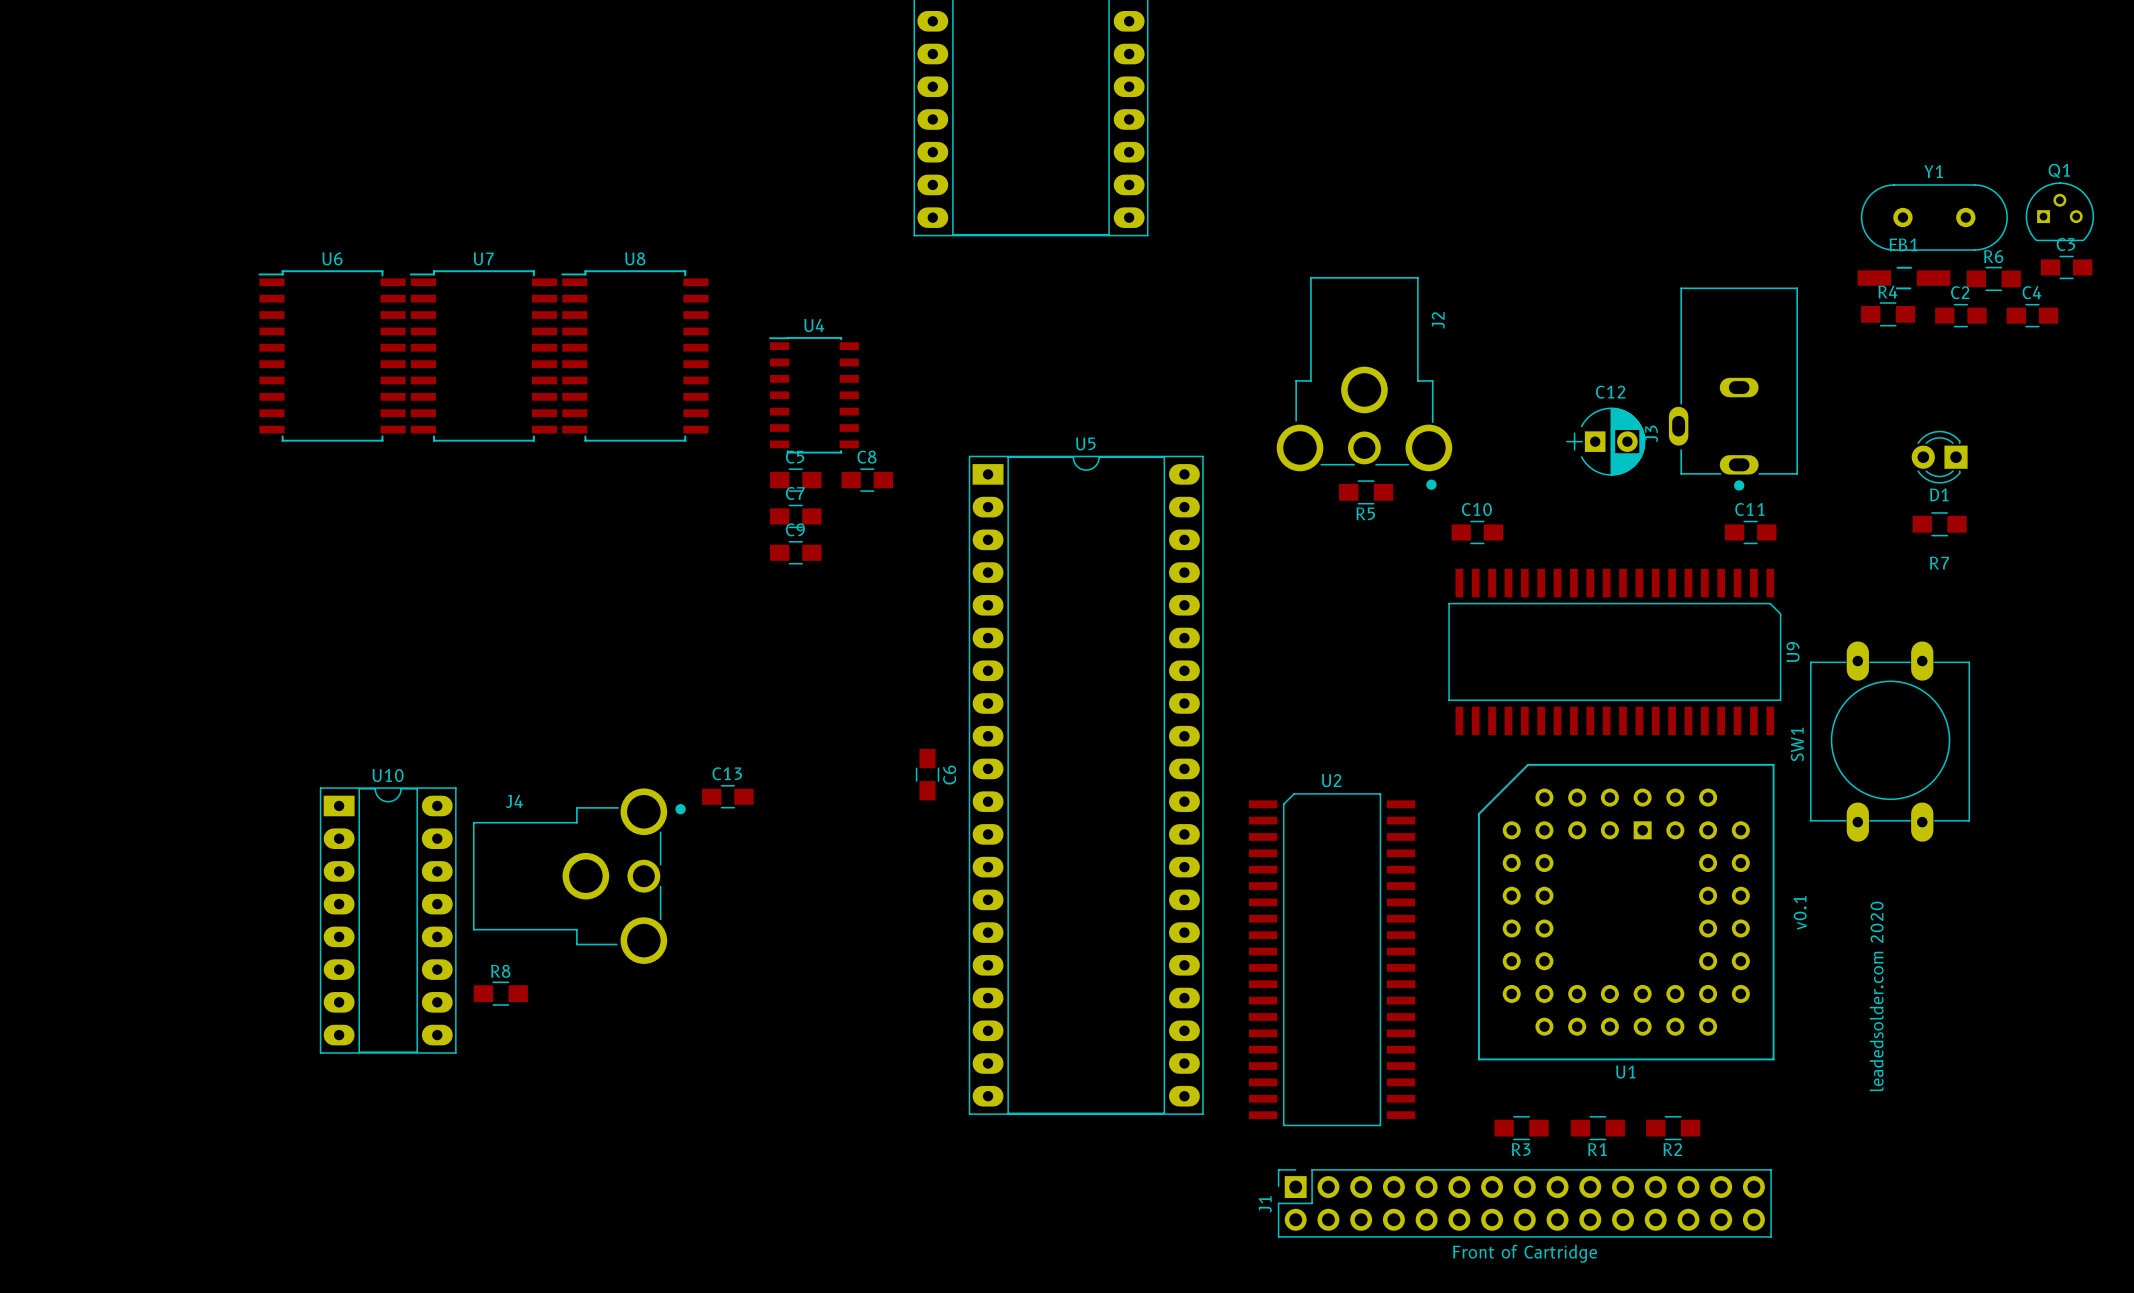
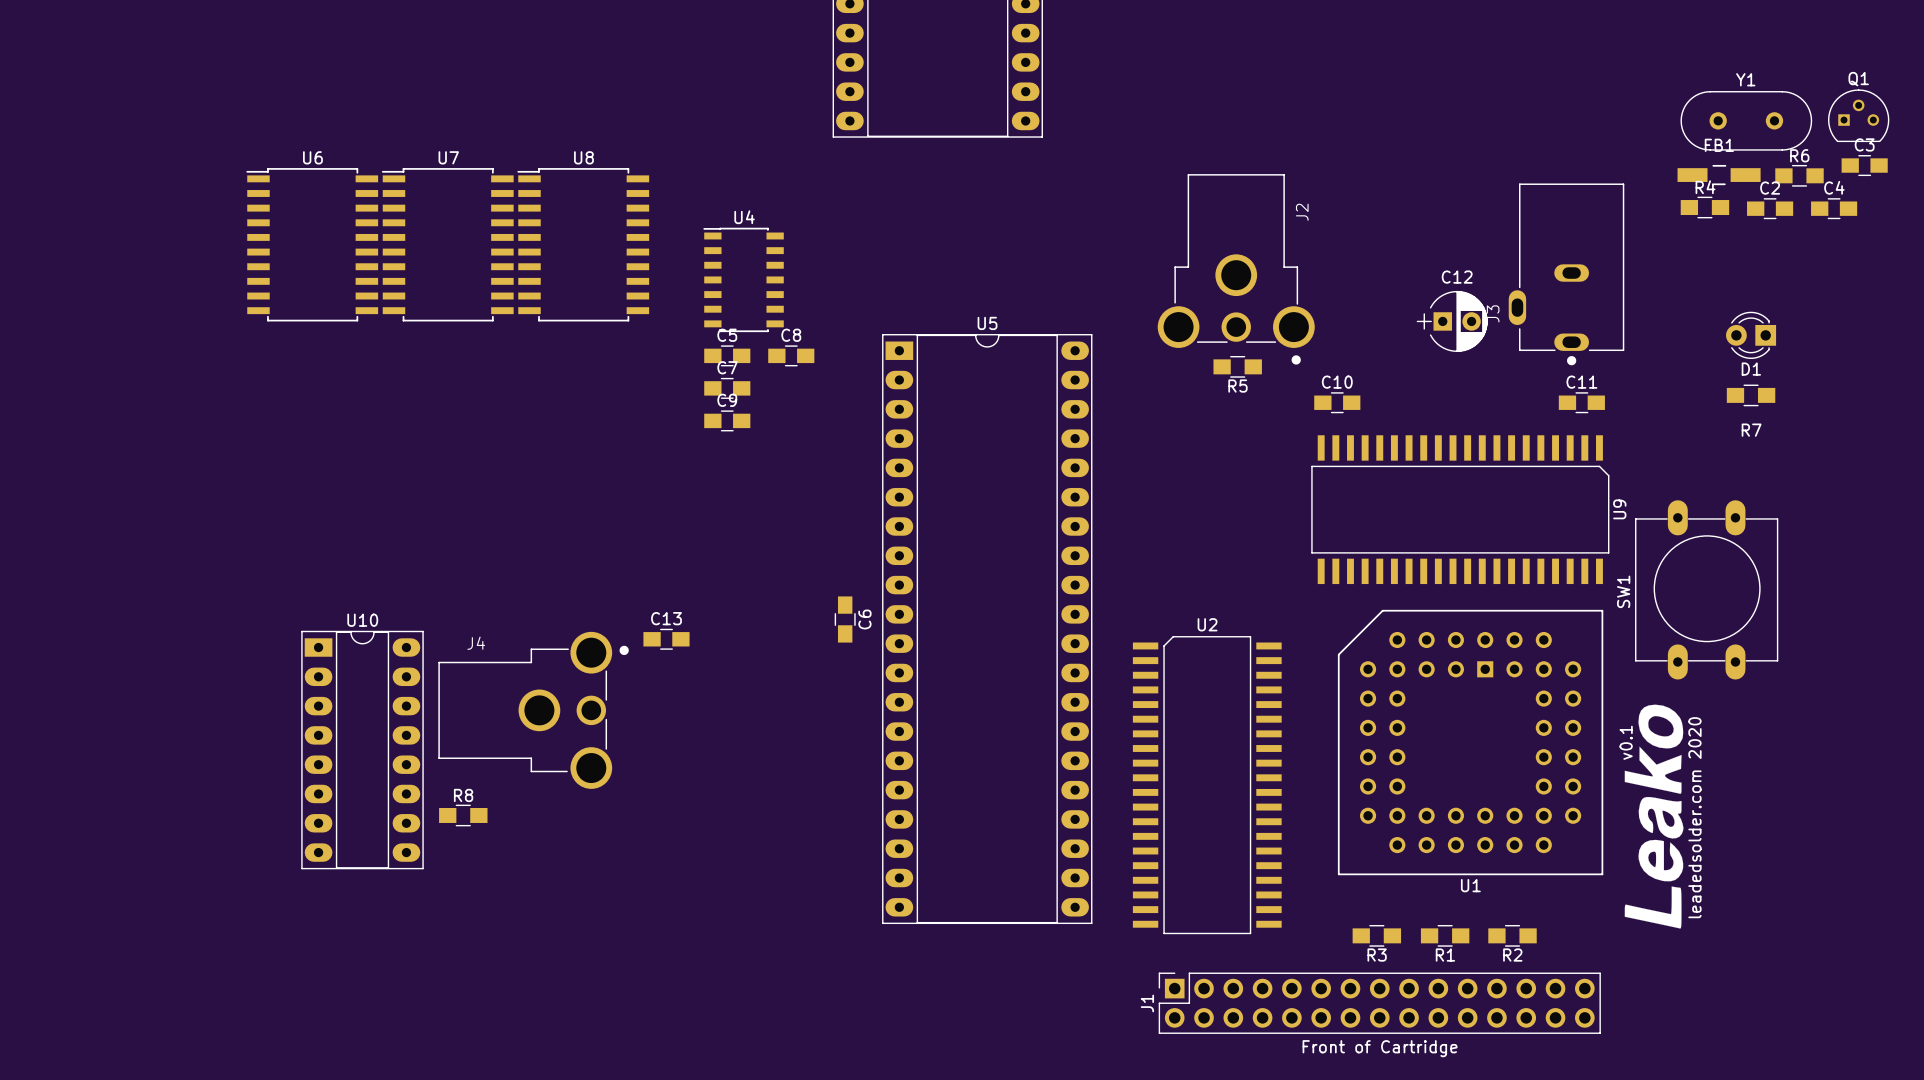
drawing: none -> [1624, 704, 1684, 929]

